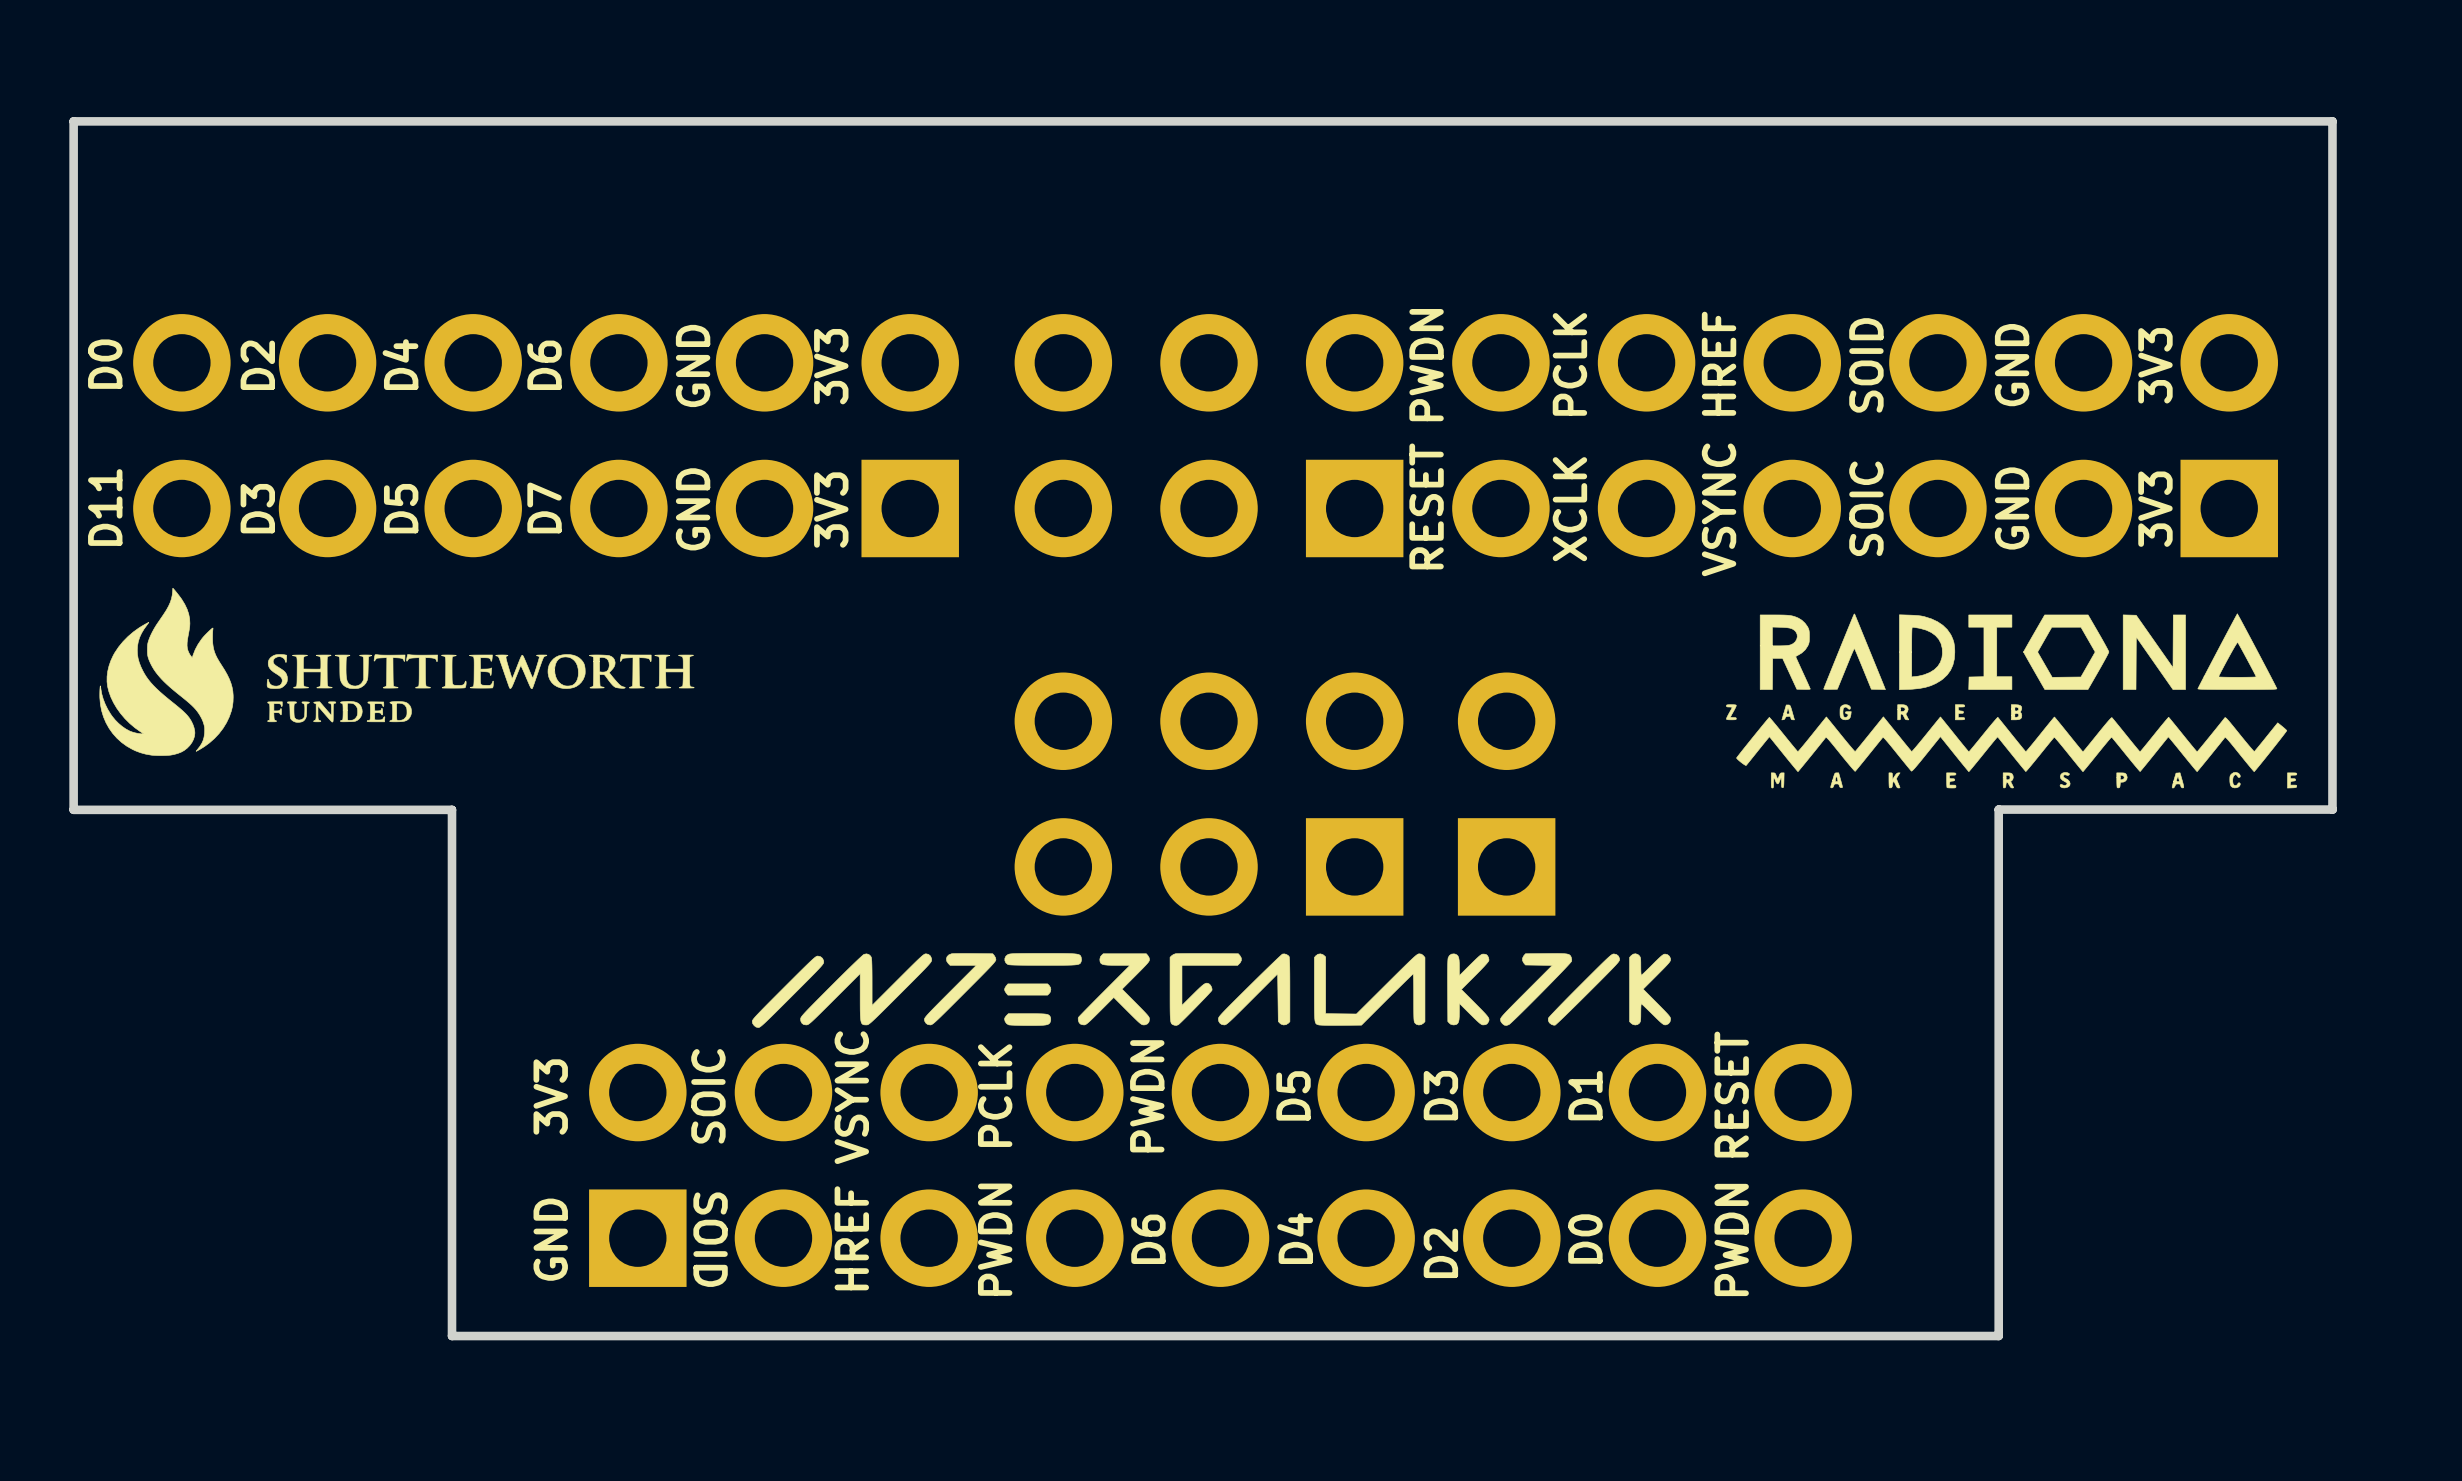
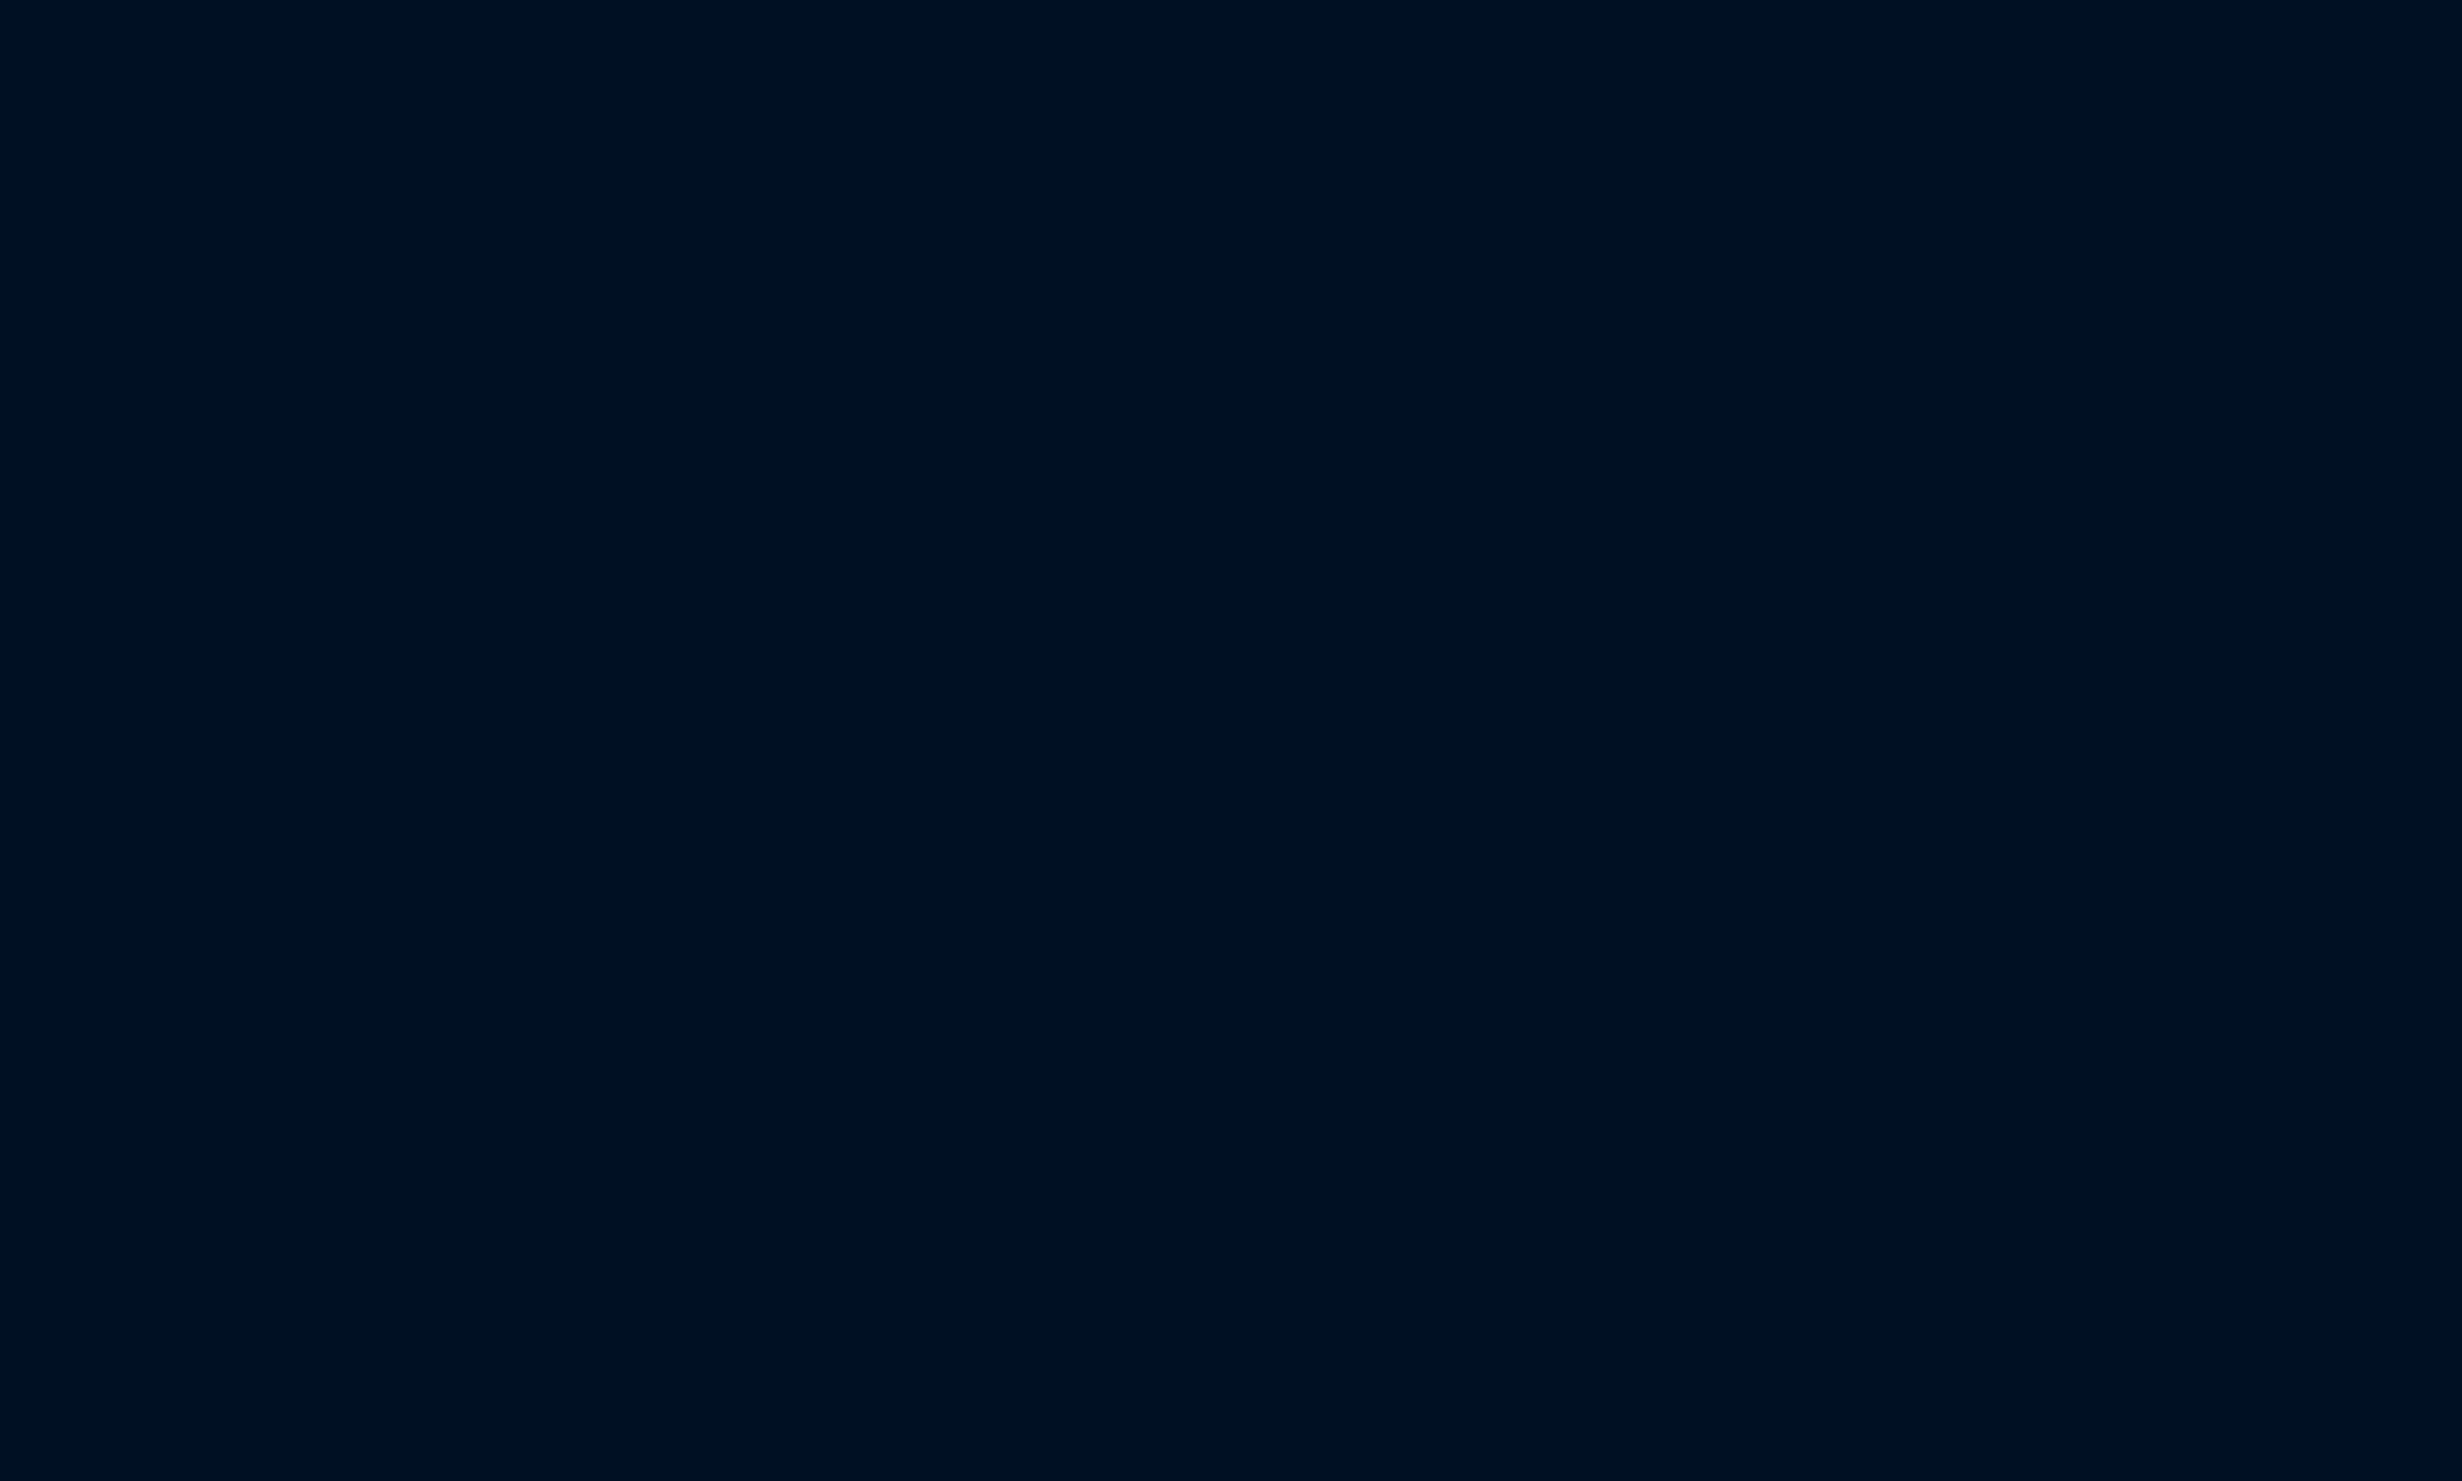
text: HREF (1719, 363) -> none
text: D0 (105, 364) -> none
text: D4 (400, 364) -> none
text: PCLK (1569, 364) -> none
text: D2 (257, 365) -> none
text: D6 (544, 365) -> none
text: GND (693, 365) -> none
text: PWDN (1426, 365) -> none
text: SOID (1866, 365) -> none
text: GND (2012, 365) -> none
text: 3V3 (2155, 365) -> none
text: 3V3 (831, 366) -> none
part: (546, 435) -> none
part: (1209, 435) -> none
part: (1865, 435) -> none
text: RESET (1426, 506) -> none
text: D11 (105, 507) -> none
text: D7 (544, 507) -> none
text: D3 (257, 508) -> none
text: D5 (401, 508) -> none
text: SOIC (1866, 508) -> none
text: GND (2012, 508) -> none
text: GND (693, 509) -> none
text: XCLK (1569, 509) -> none
text: VSYNC (1719, 509) -> none
text: 3V3 (2155, 509) -> none
text: 3V3 (831, 510) -> none
drawing: [99, 587, 695, 756] -> none
drawing: [1726, 613, 2298, 789] -> none
part: (1209, 794) -> none
part: (1506, 794) -> none
board edge: (2332, 809) (1998, 809) (1998, 1336) (452, 1336) (452, 809) (73, 809) -> none
board edge: (2332, 809) (2332, 121) (73, 121) (73, 809) -> none
drawing: [751, 953, 1671, 1028] -> none
text: RESET (1731, 1094) -> none
text: PCLK (995, 1095) -> none
text: D5 (1293, 1095) -> none
text: D3 (1440, 1095) -> none
text: D1 (1585, 1095) -> none
text: 3V3 (550, 1096) -> none
text: SOIC (708, 1096) -> none
text: PWDN (1147, 1096) -> none
text: VSYNC (851, 1097) -> none
part: (1220, 1165) -> none
text: HREF (851, 1238) -> none
text: D4 (1295, 1238) -> none
text: GND (550, 1239) -> none
text: SOID (710, 1239) -> none
text: PWDN (995, 1239) -> none
text: D6 (1148, 1239) -> none
text: D0 (1585, 1239) -> none
text: PWDN (1731, 1239) -> none
text: D2 (1440, 1253) -> none

